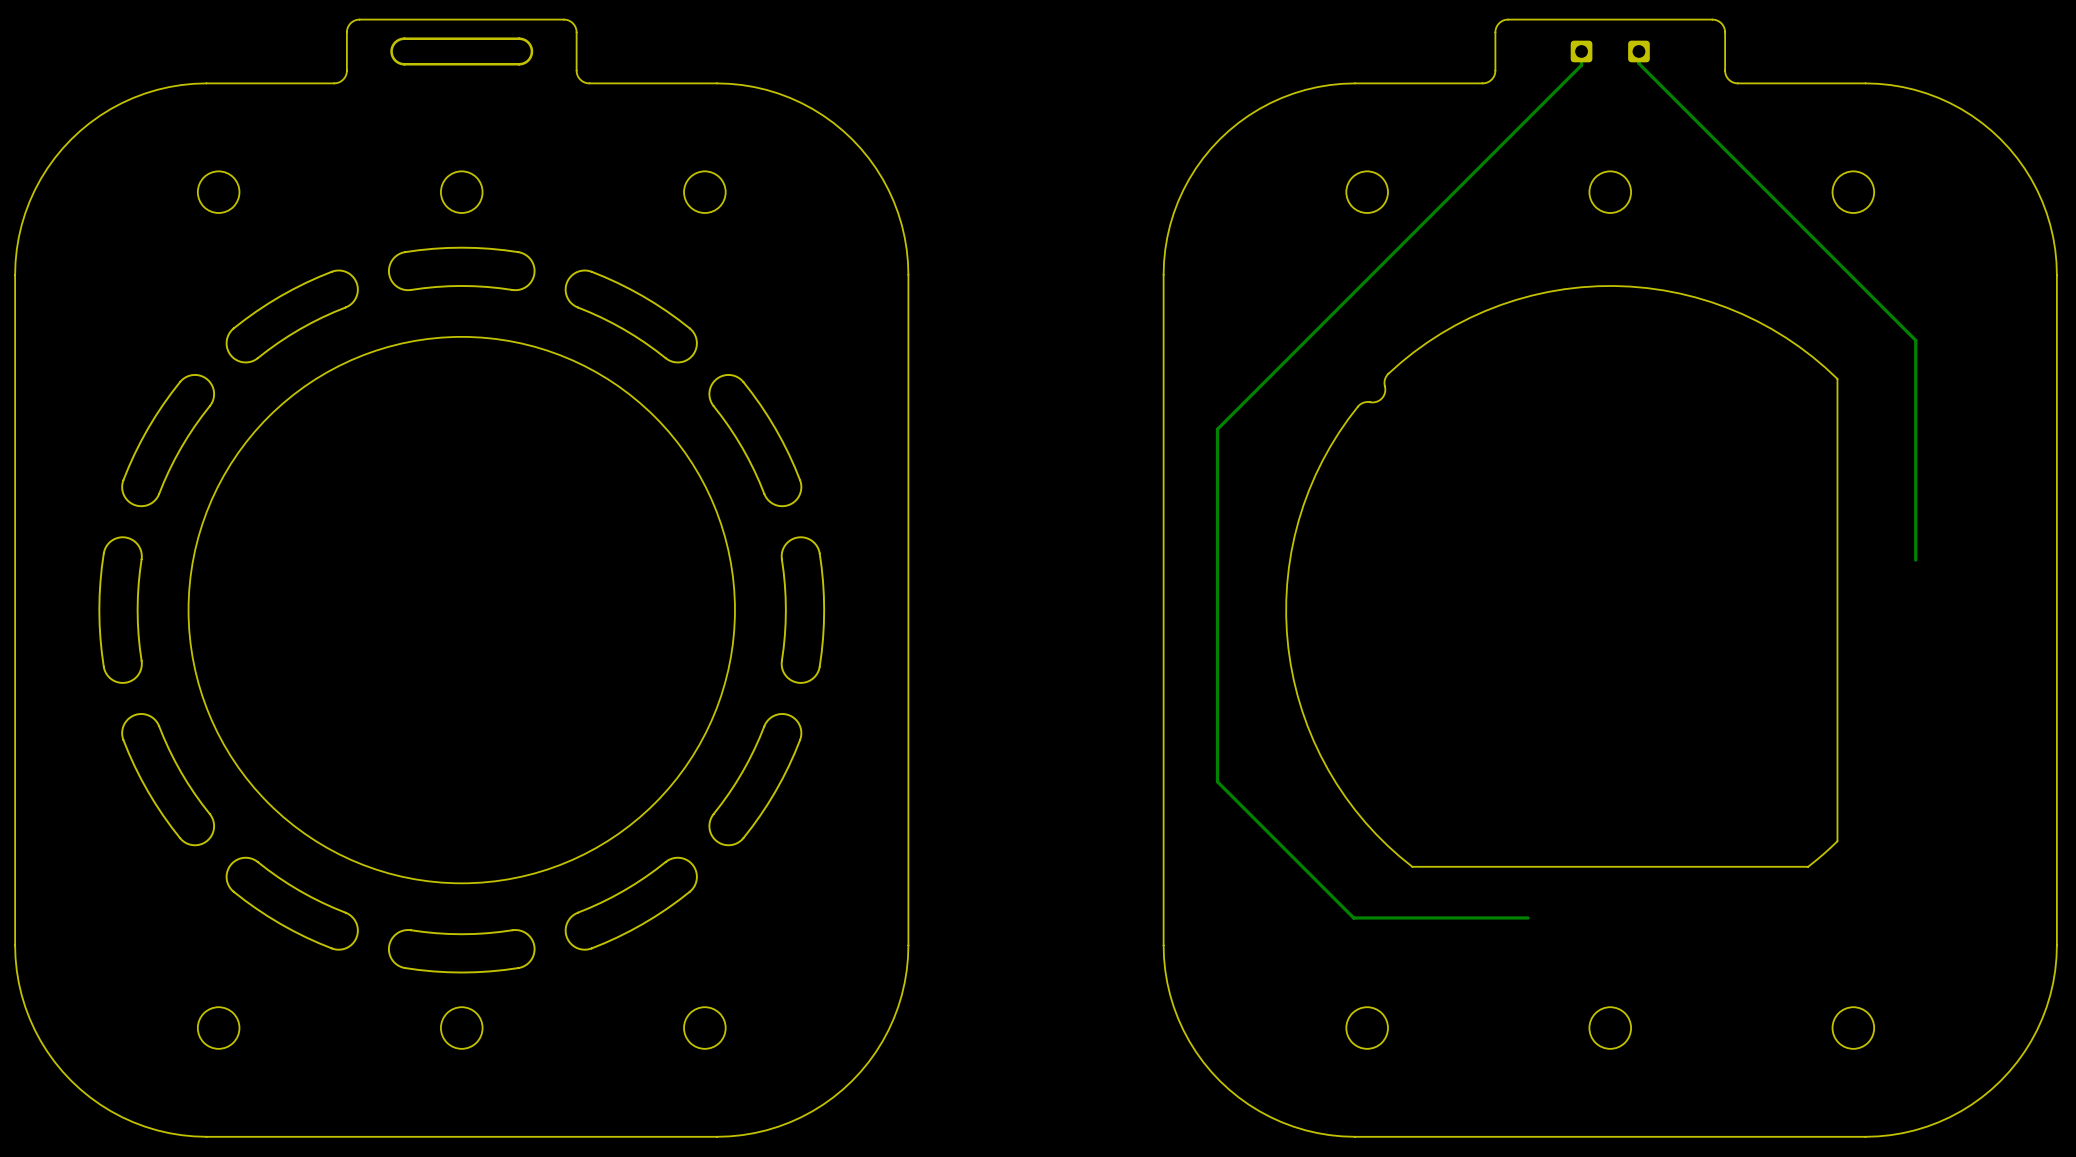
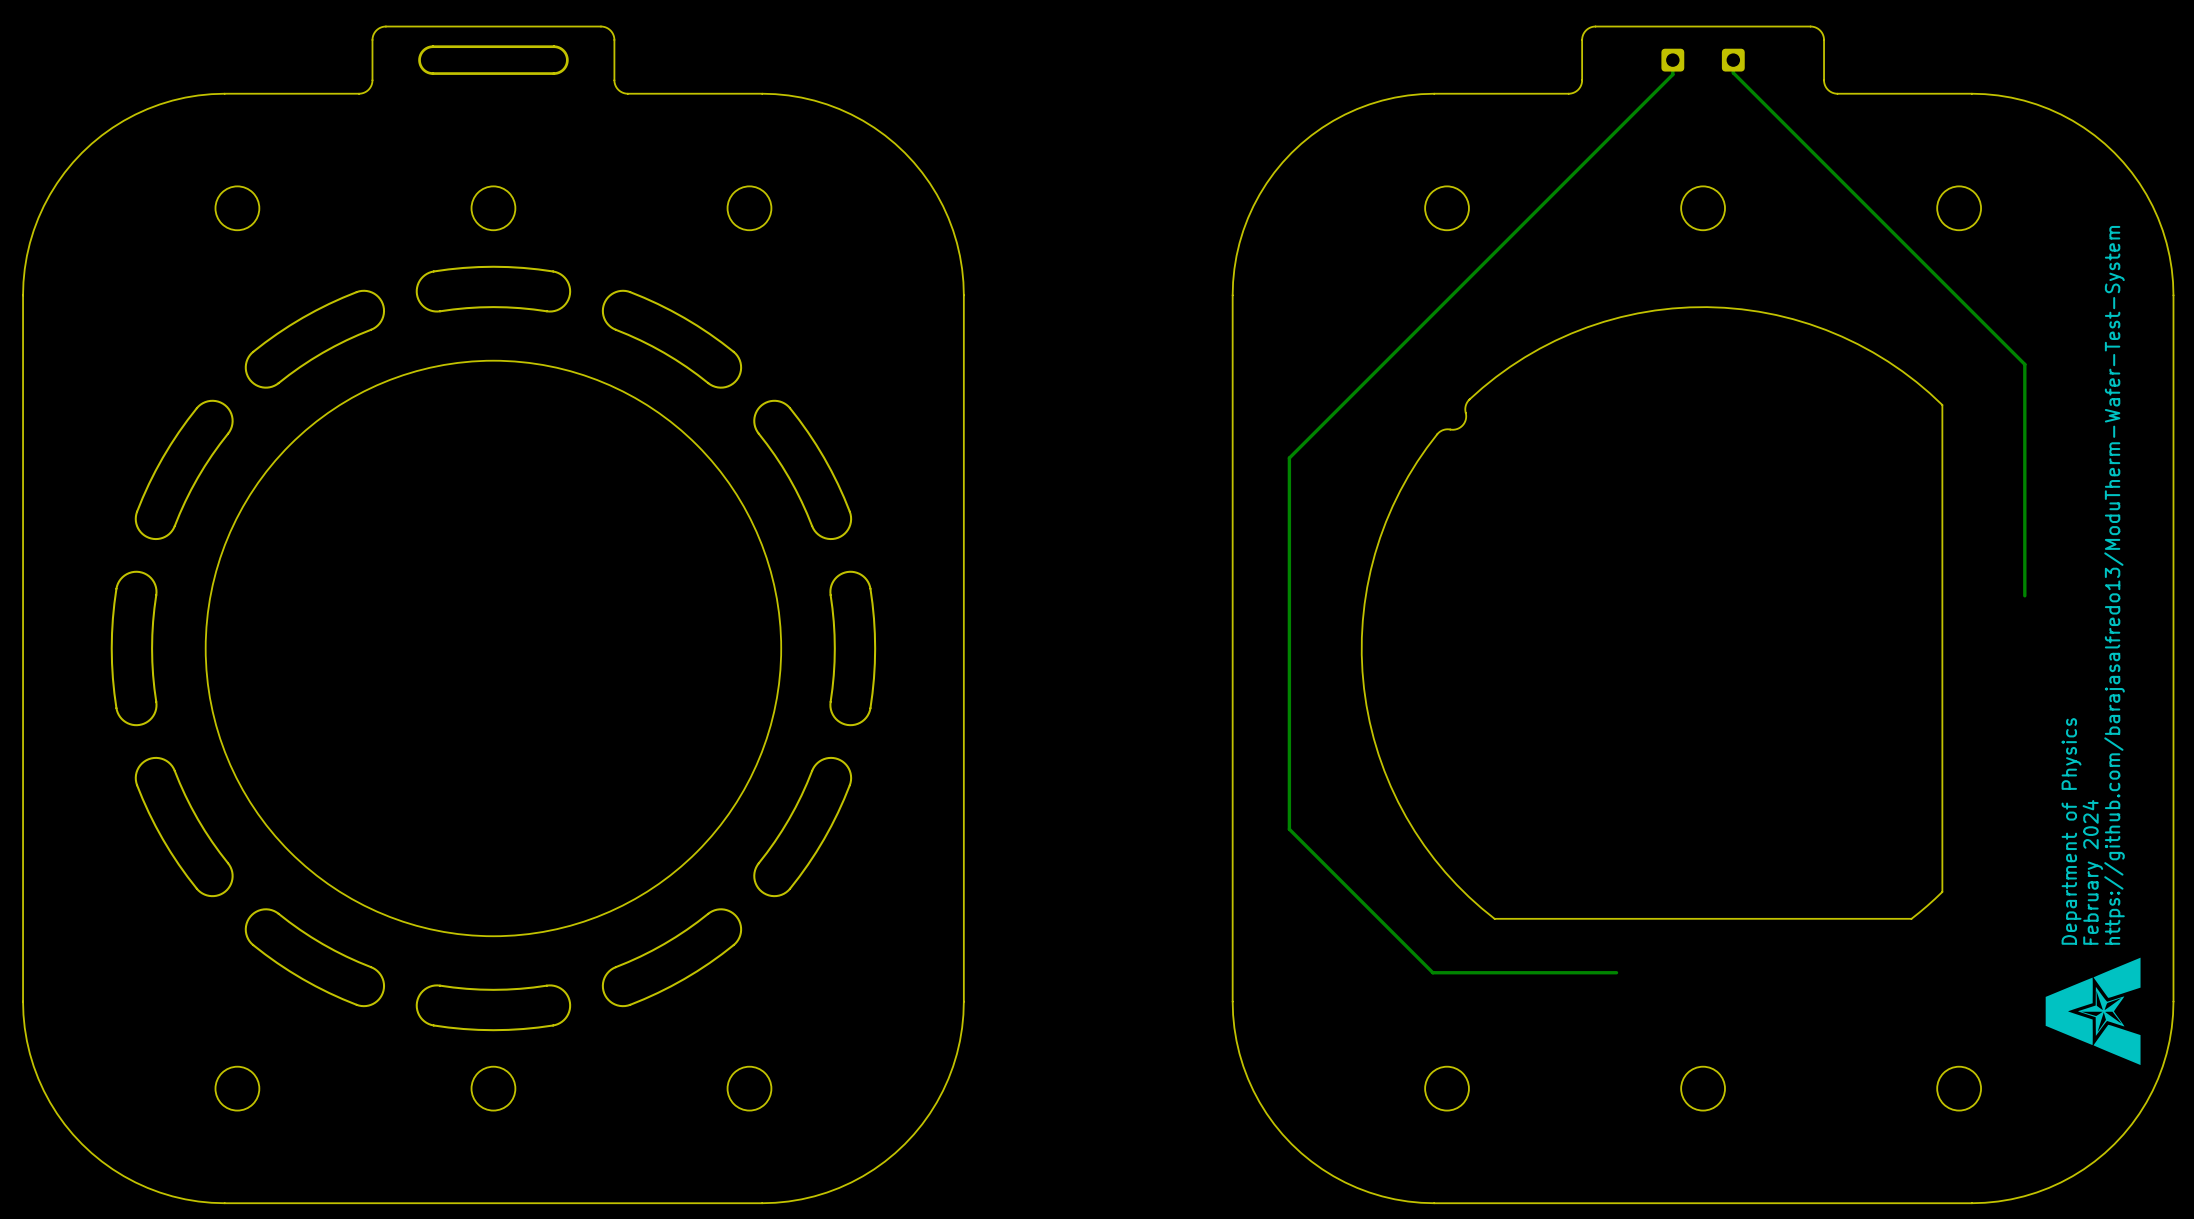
text: none -> https://github.com/barajasalfredo13/ModuTherm-Wafer-Test-System (2114, 585)
text: none -> Department of Physics (2071, 831)
text: none -> February 2024 (2092, 872)
drawing: none -> [2045, 957, 2141, 1066]

